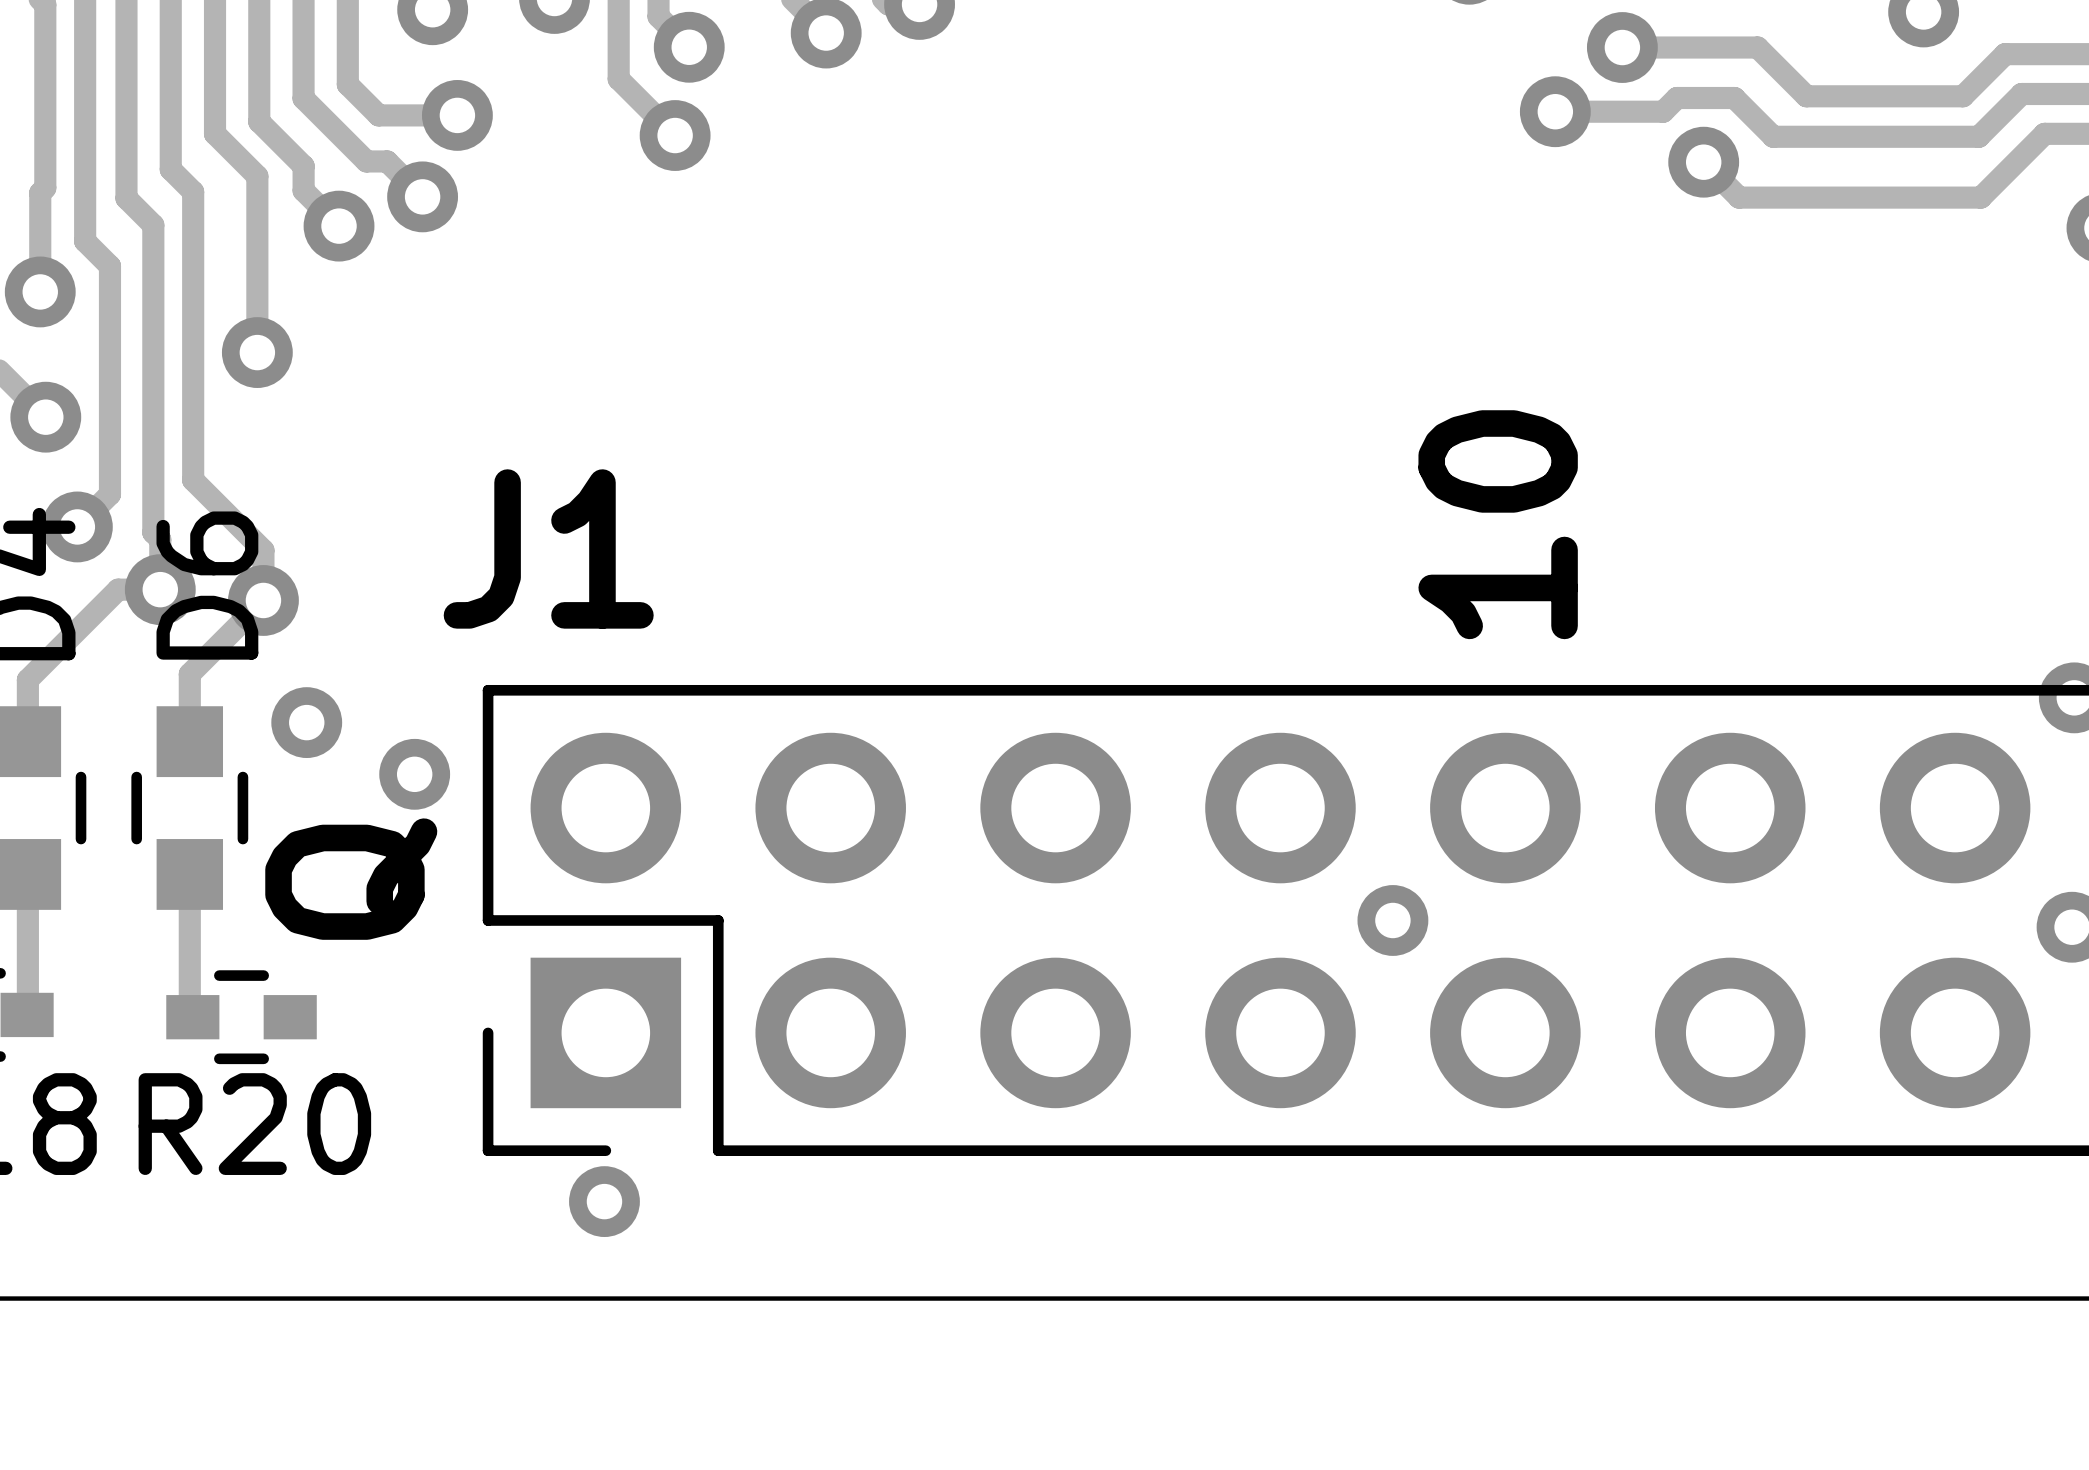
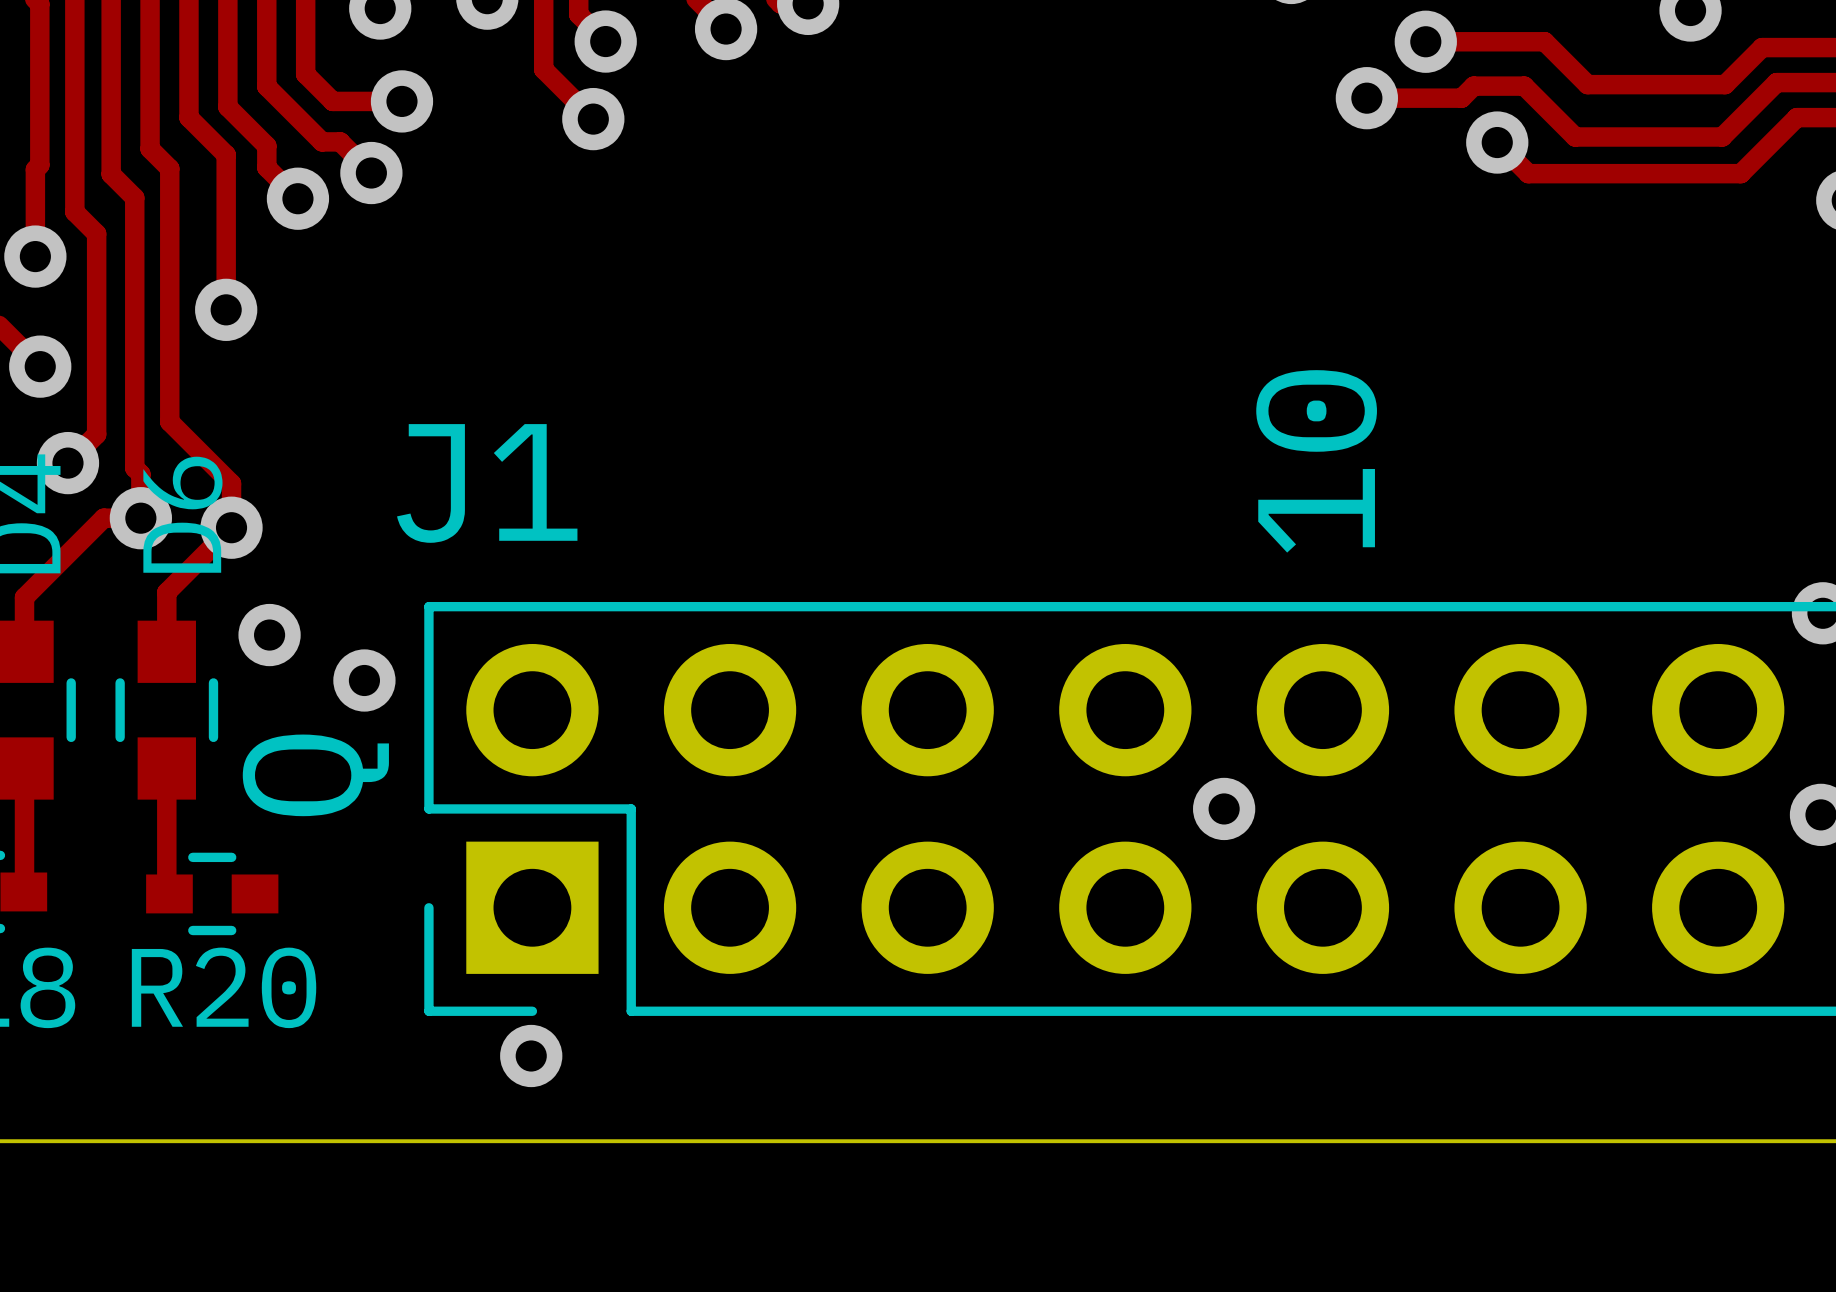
track: (1773, 136) (1978, 136) -> (1558, 120) (1575, 137) (1722, 137) (1739, 120)

